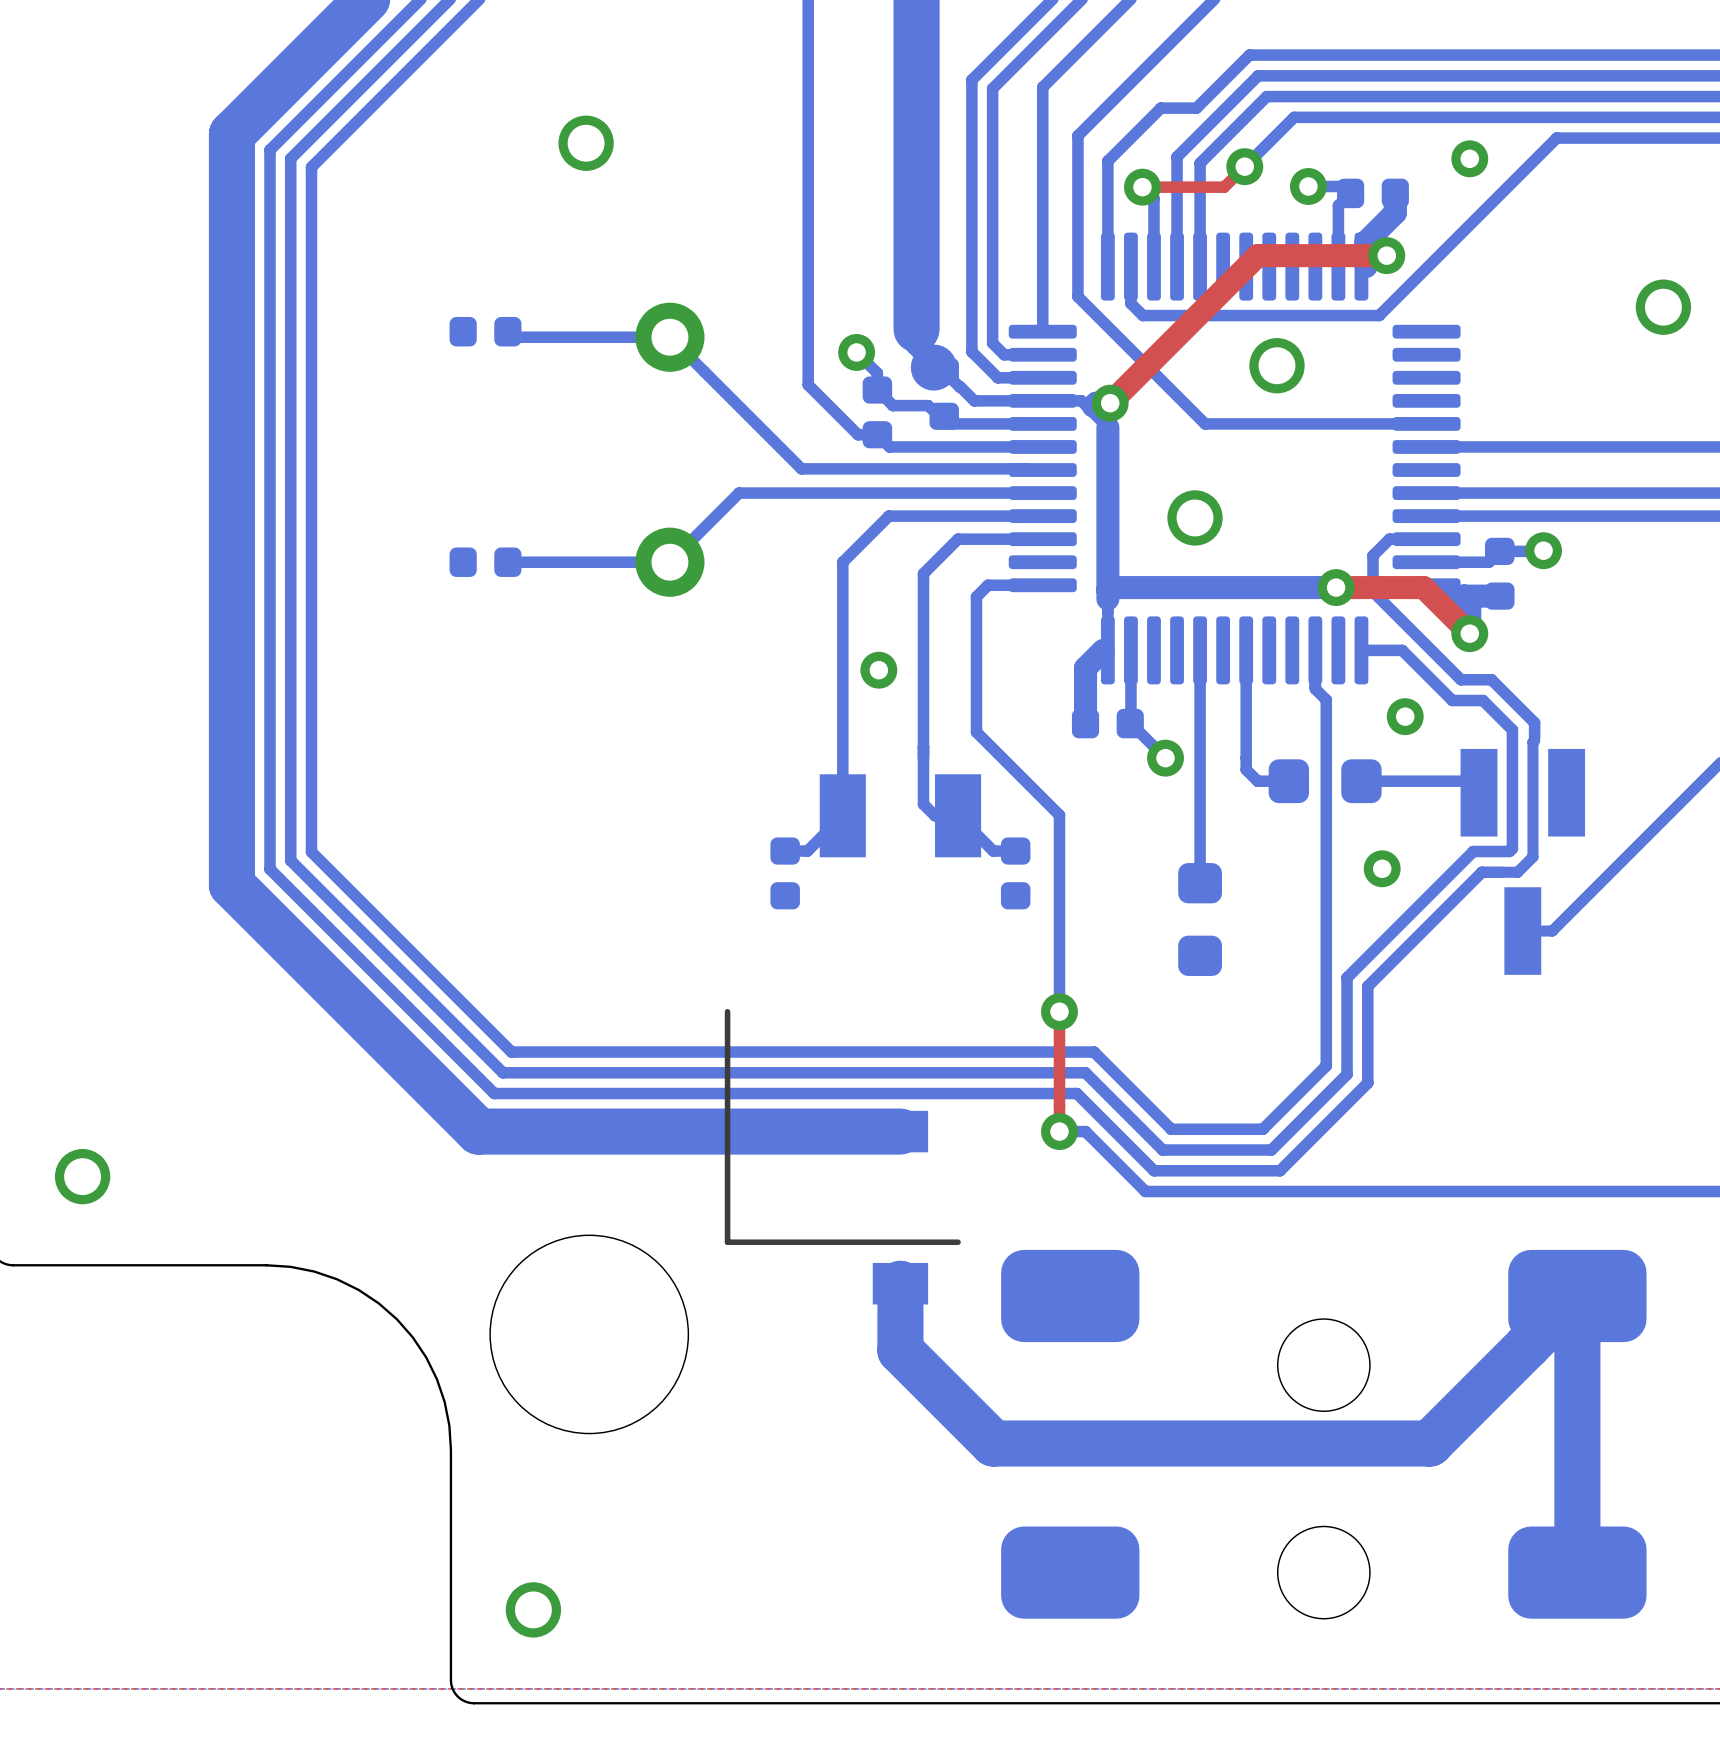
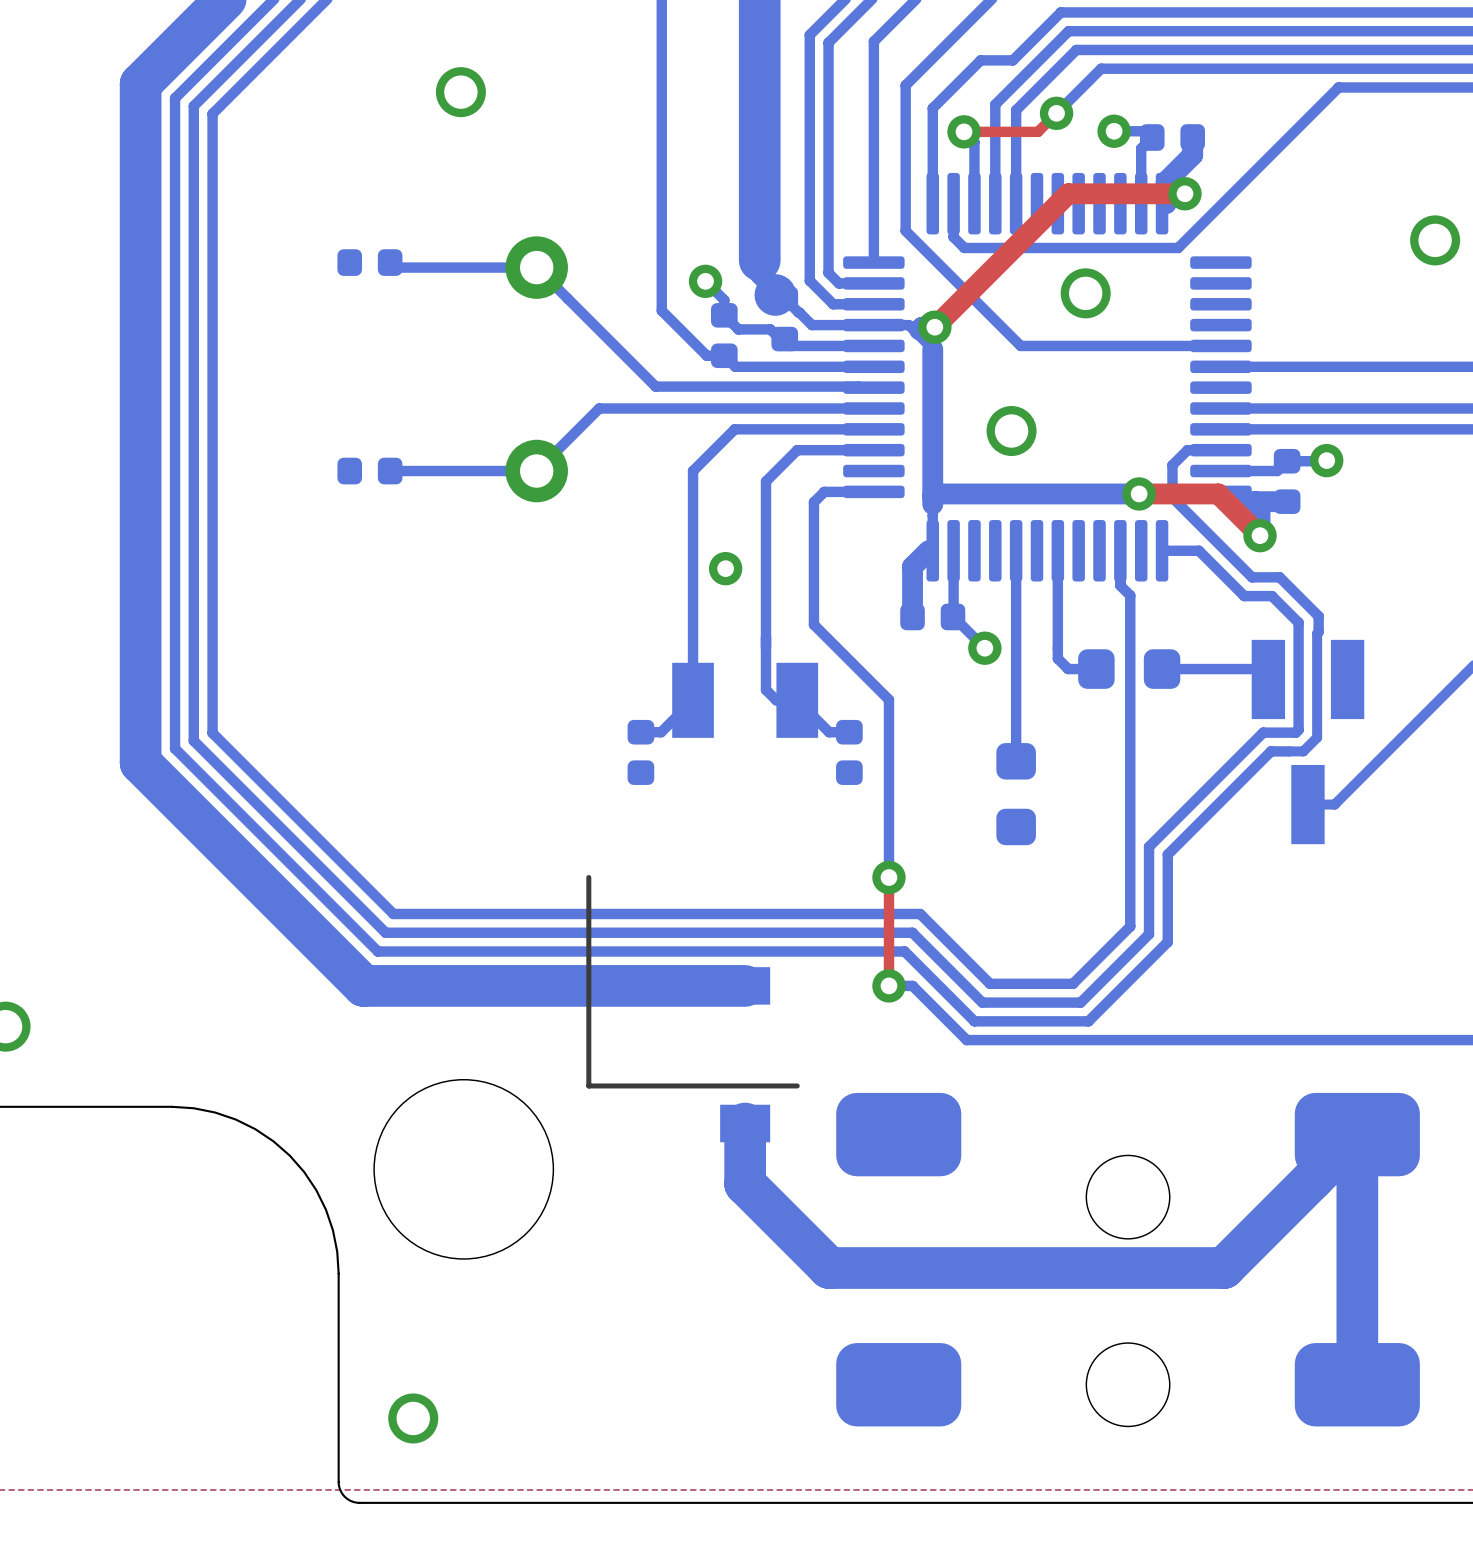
via: (1469, 158) -> none
via: (1405, 716) -> none
via: (1382, 868) -> none

